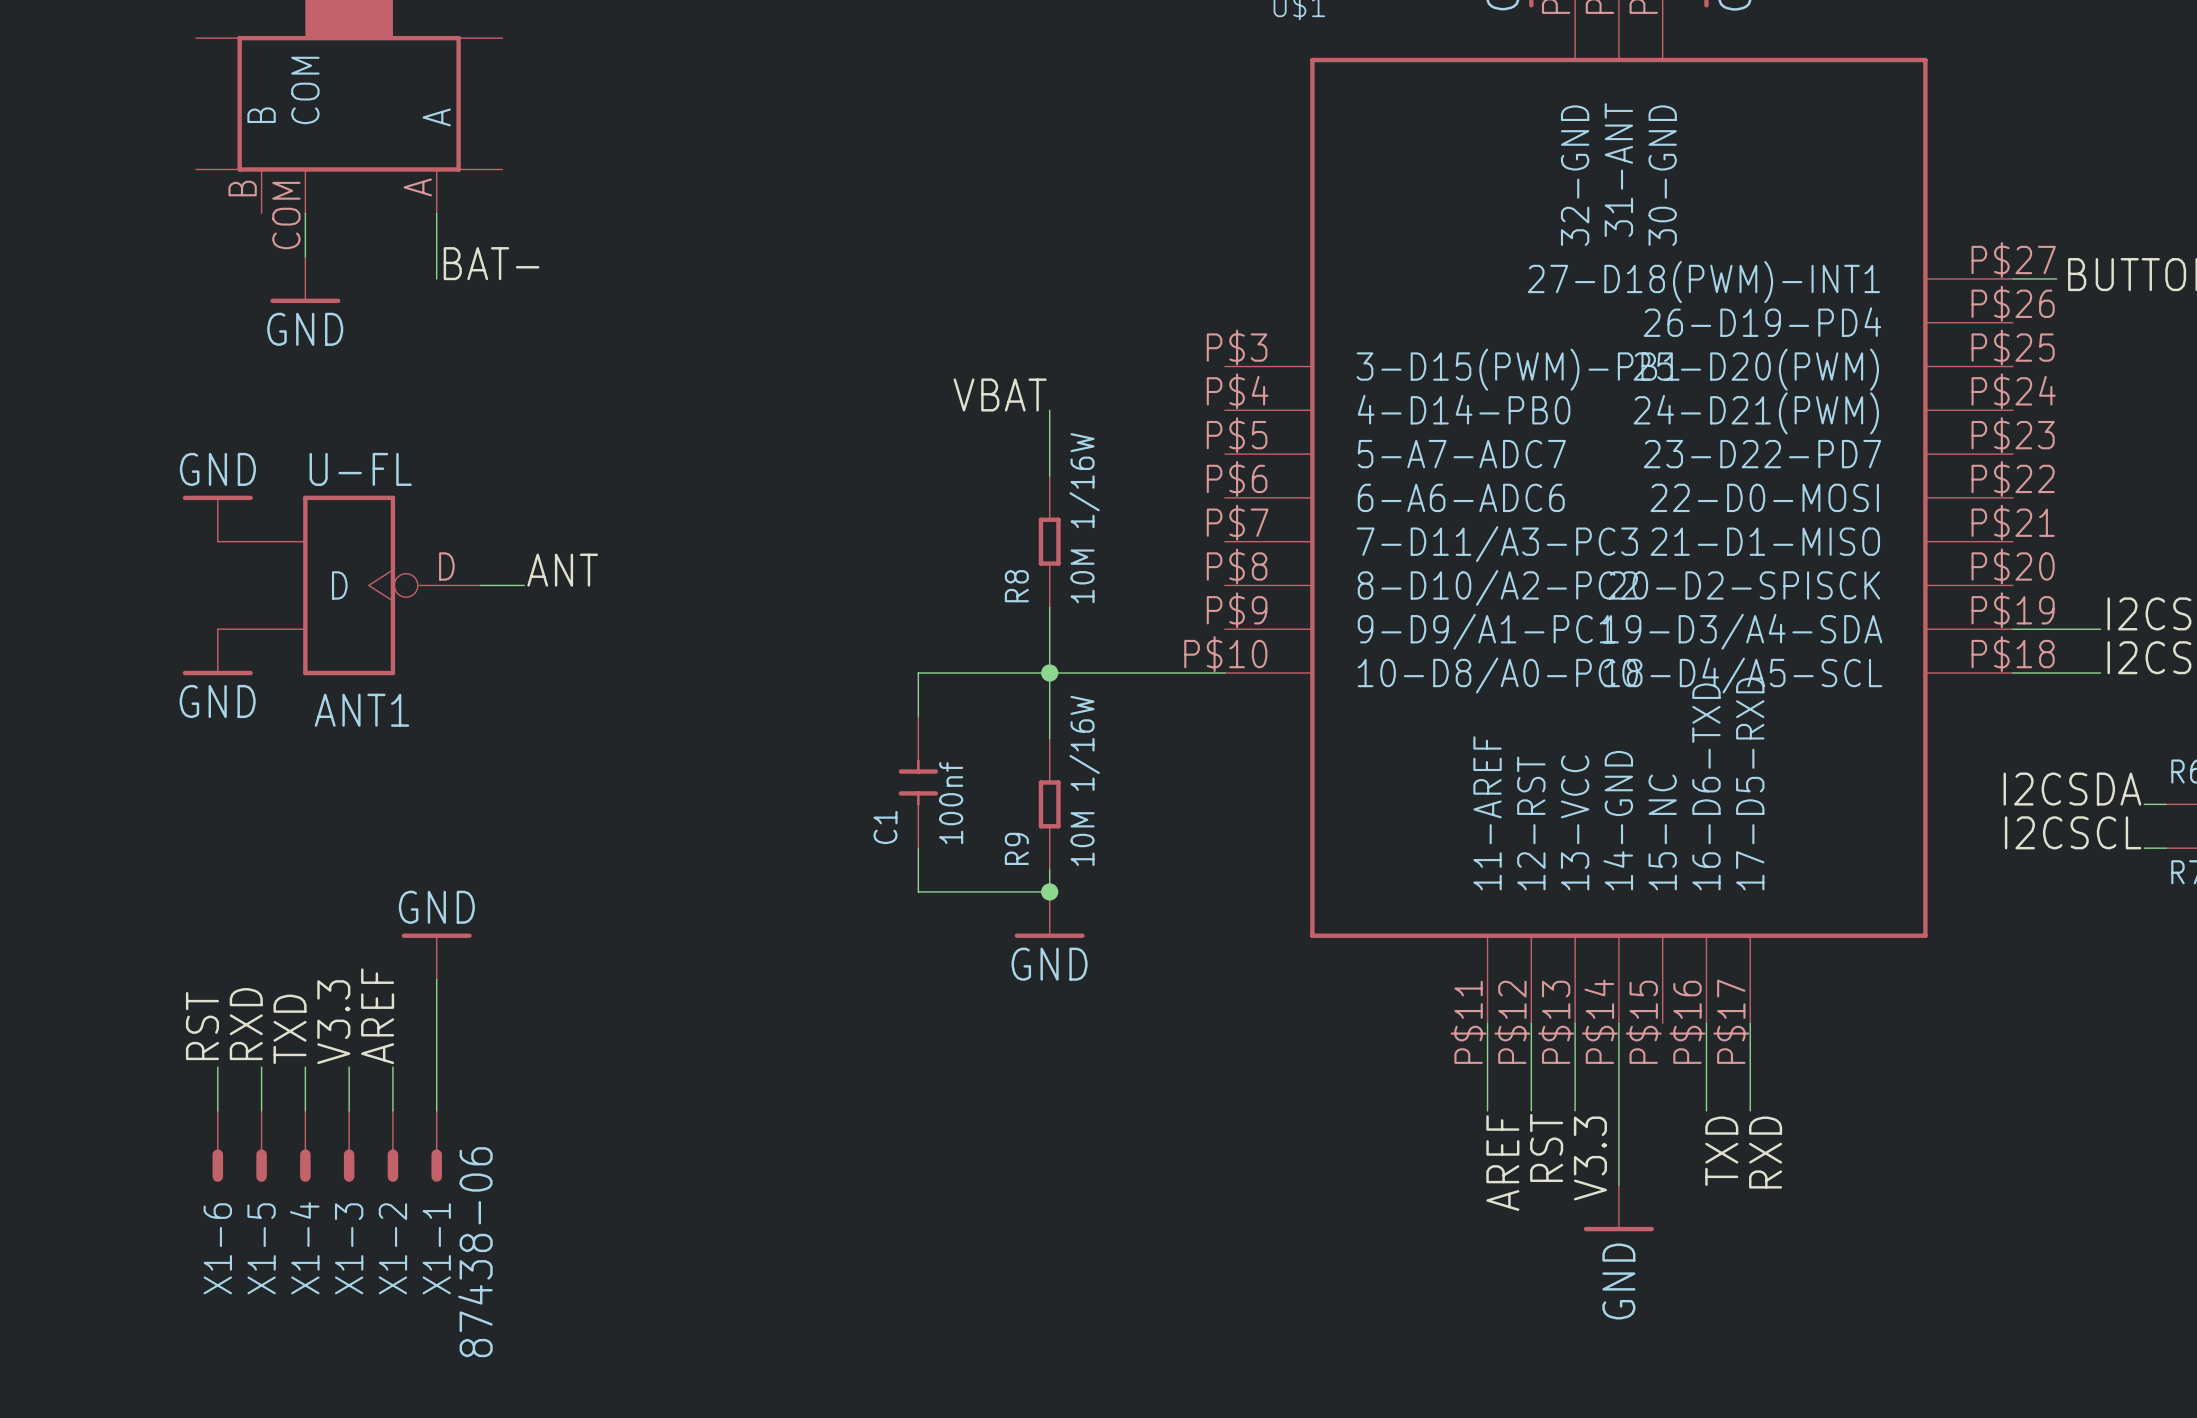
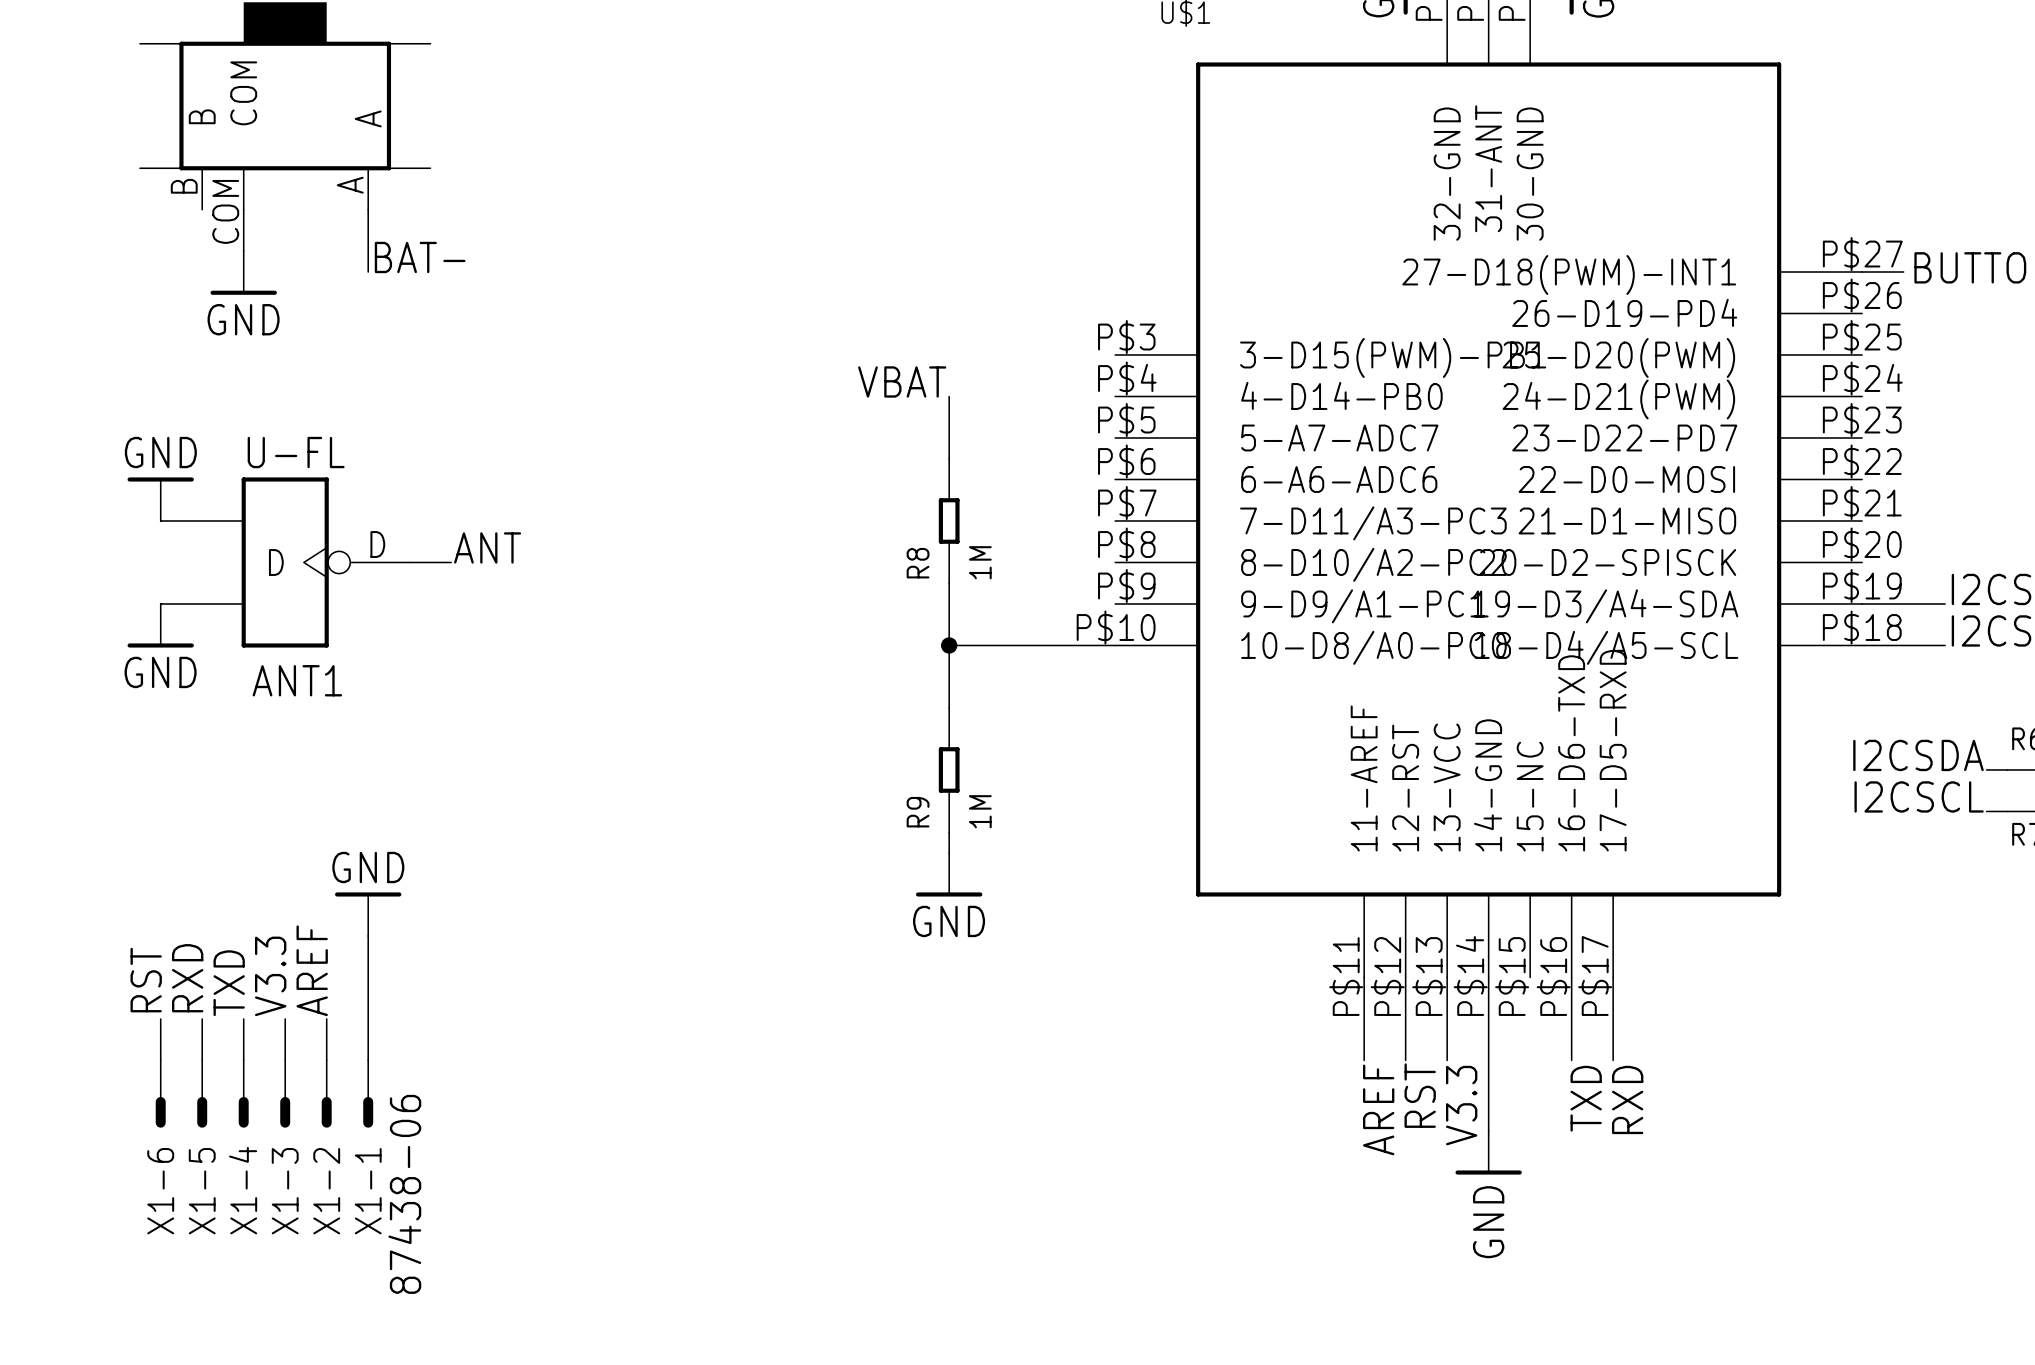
R8 value: 10M 1/16W (1084, 518) -> 1M (980, 562)
wire: (1049, 673) (918, 673) (918, 716) -> none
R9 value: 10M 1/16W (1084, 780) -> 1M (980, 811)
C1: 100nf (918, 782) -> none
wire: (918, 848) (918, 891) (1049, 891) -> none
junction: (1049, 891) -> none

